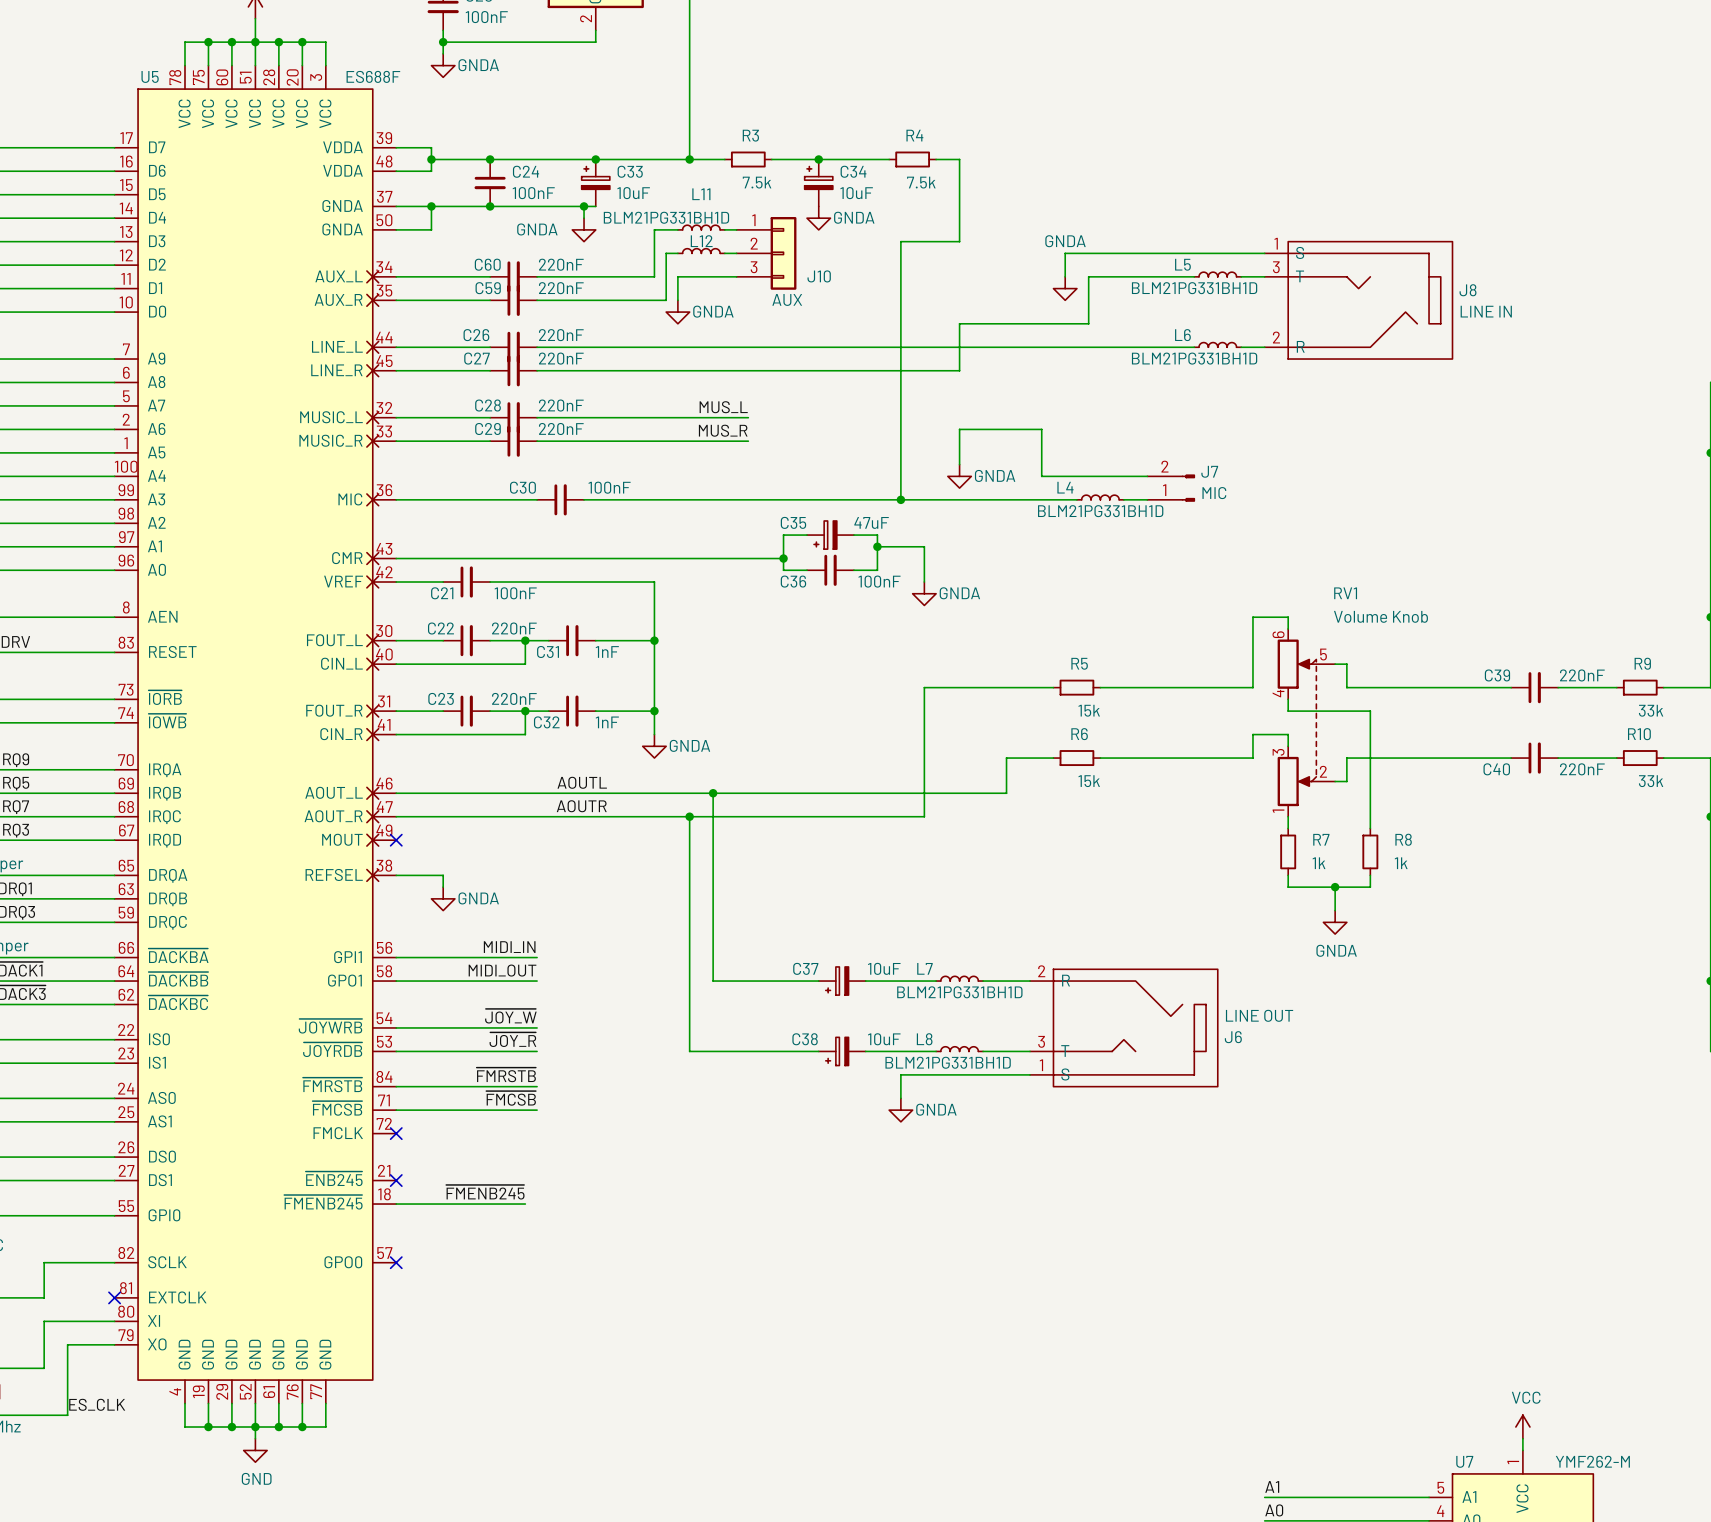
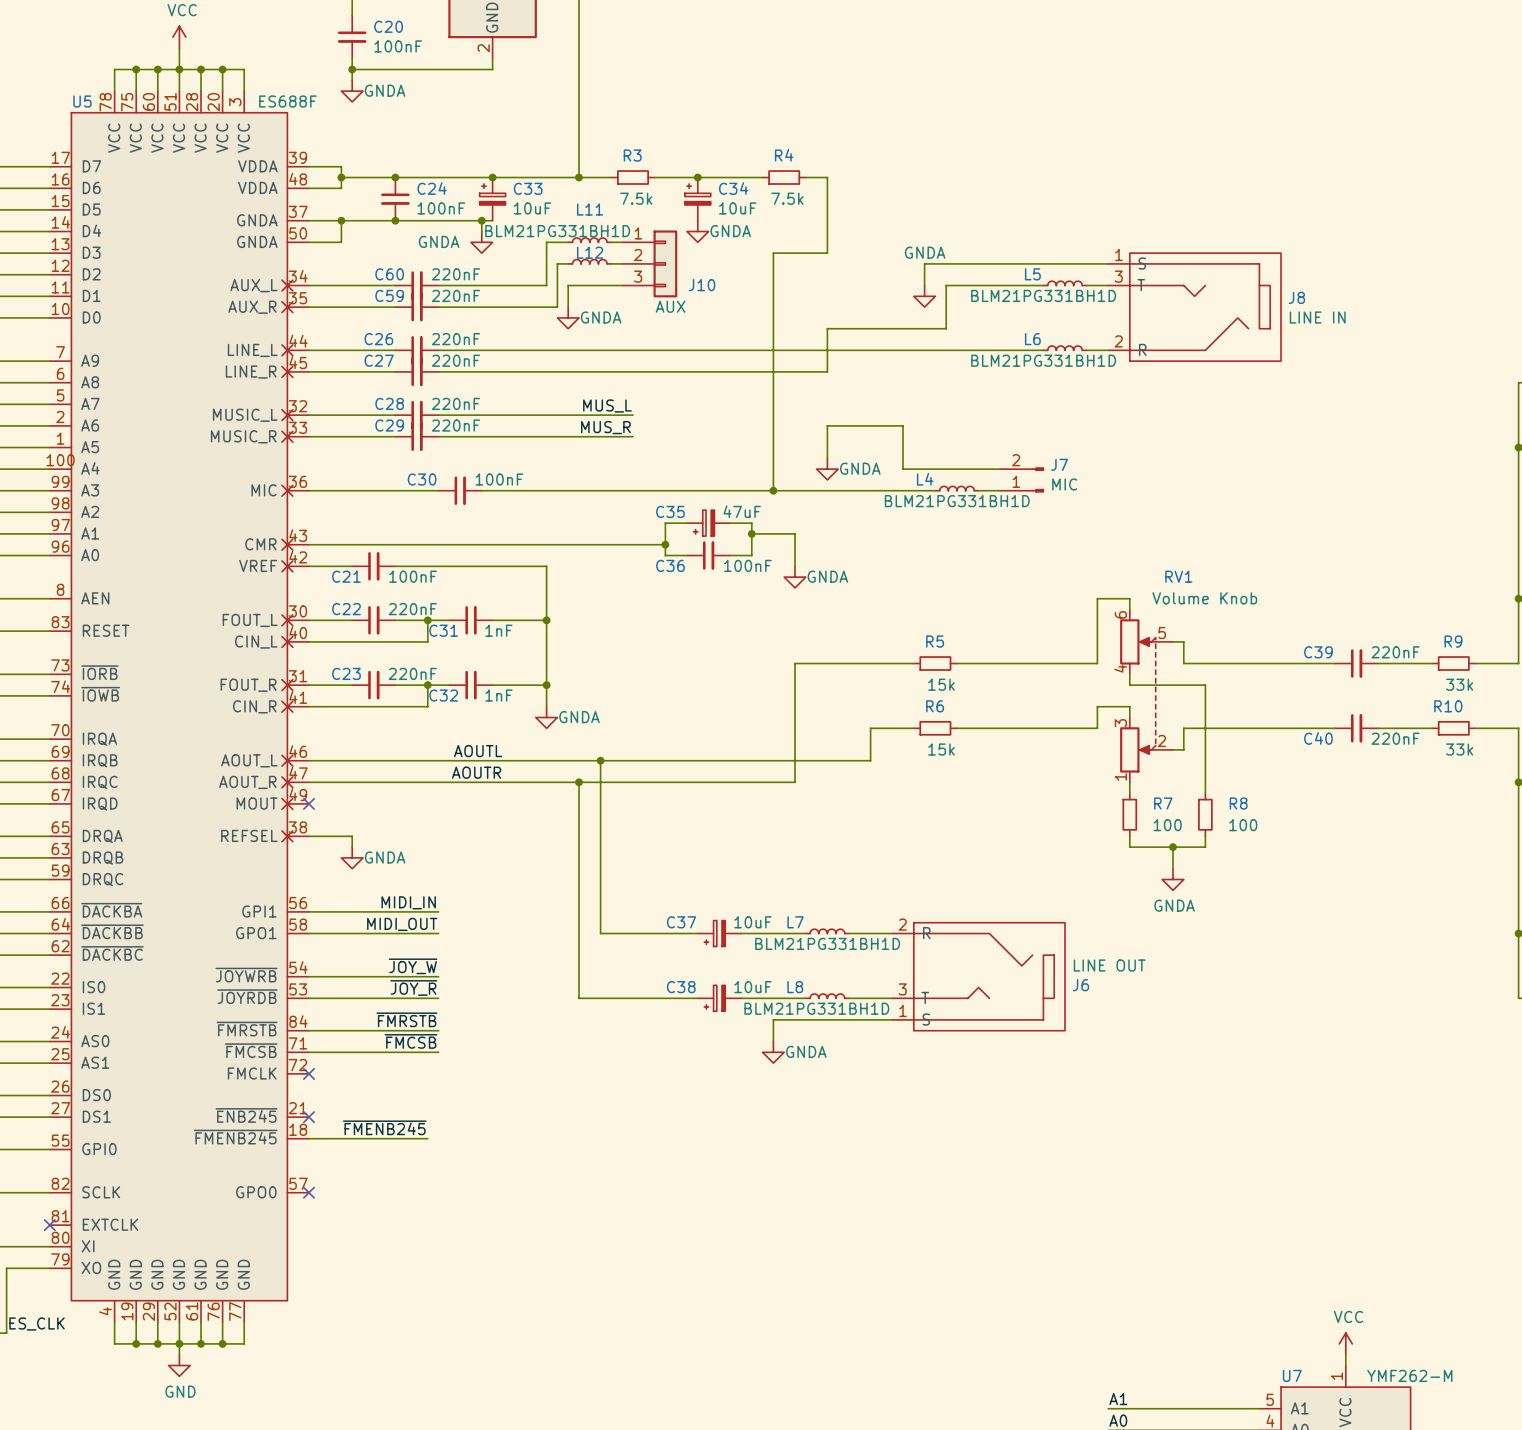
R7 value: 1k (1319, 863) -> 100 (1167, 825)
R8 value: 1k (1401, 863) -> 100 (1243, 825)

